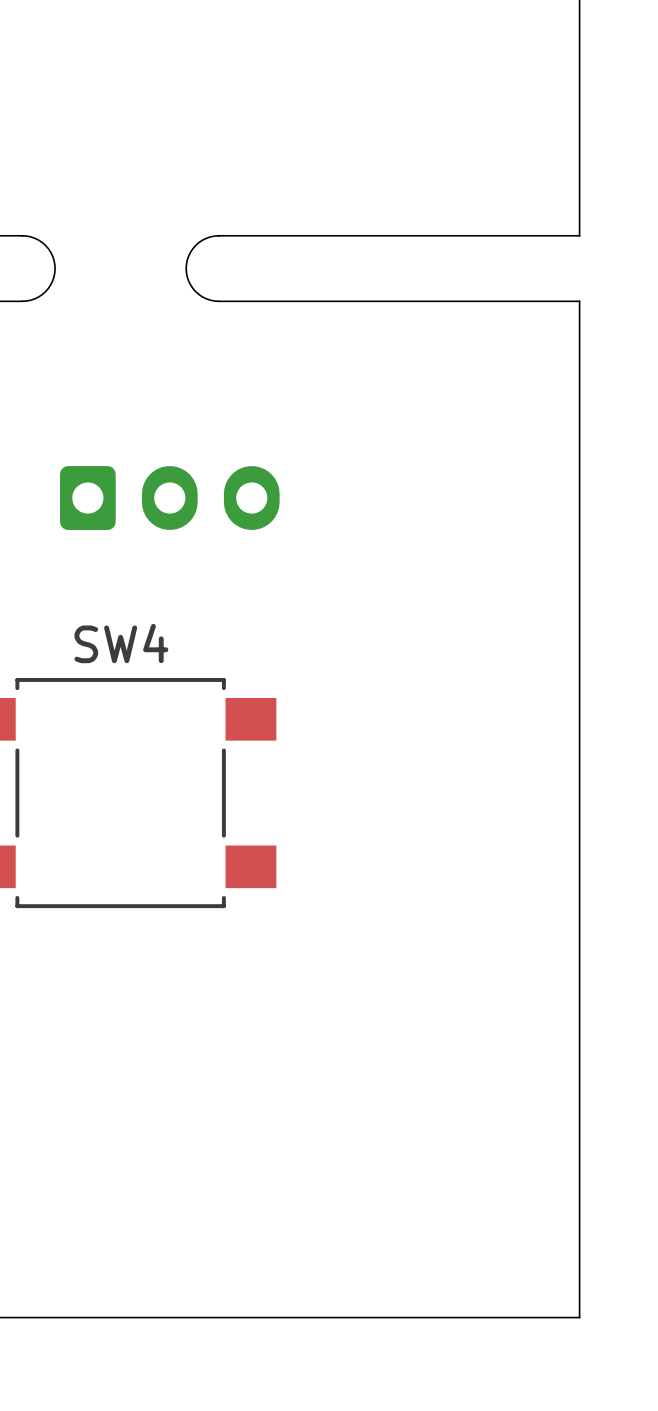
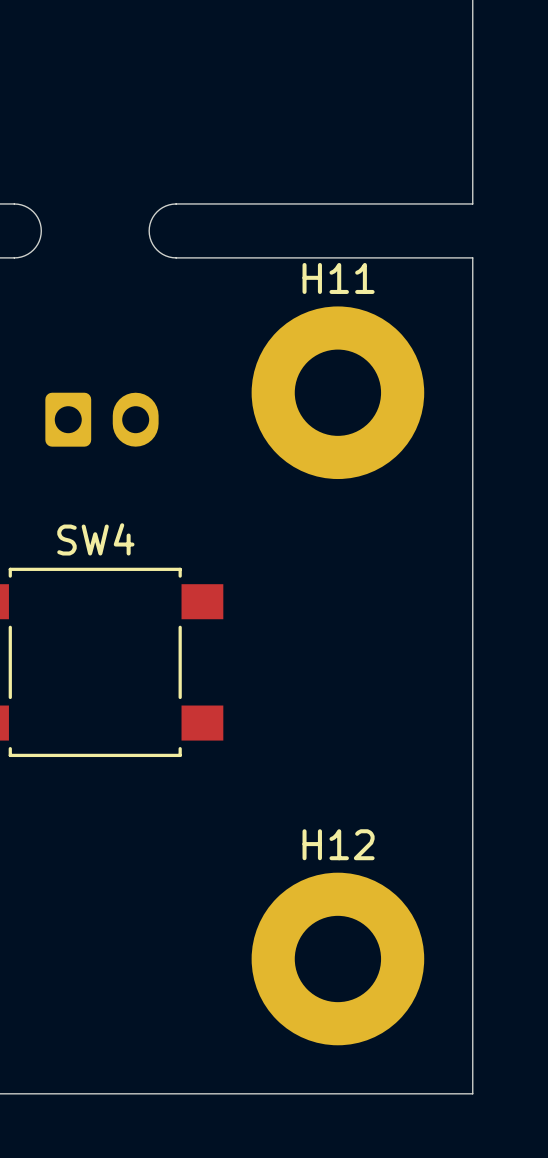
H11: none -> (337, 392)
part: none -> (101, 419)
part: (169, 498) -> none
H12: none -> (337, 958)

